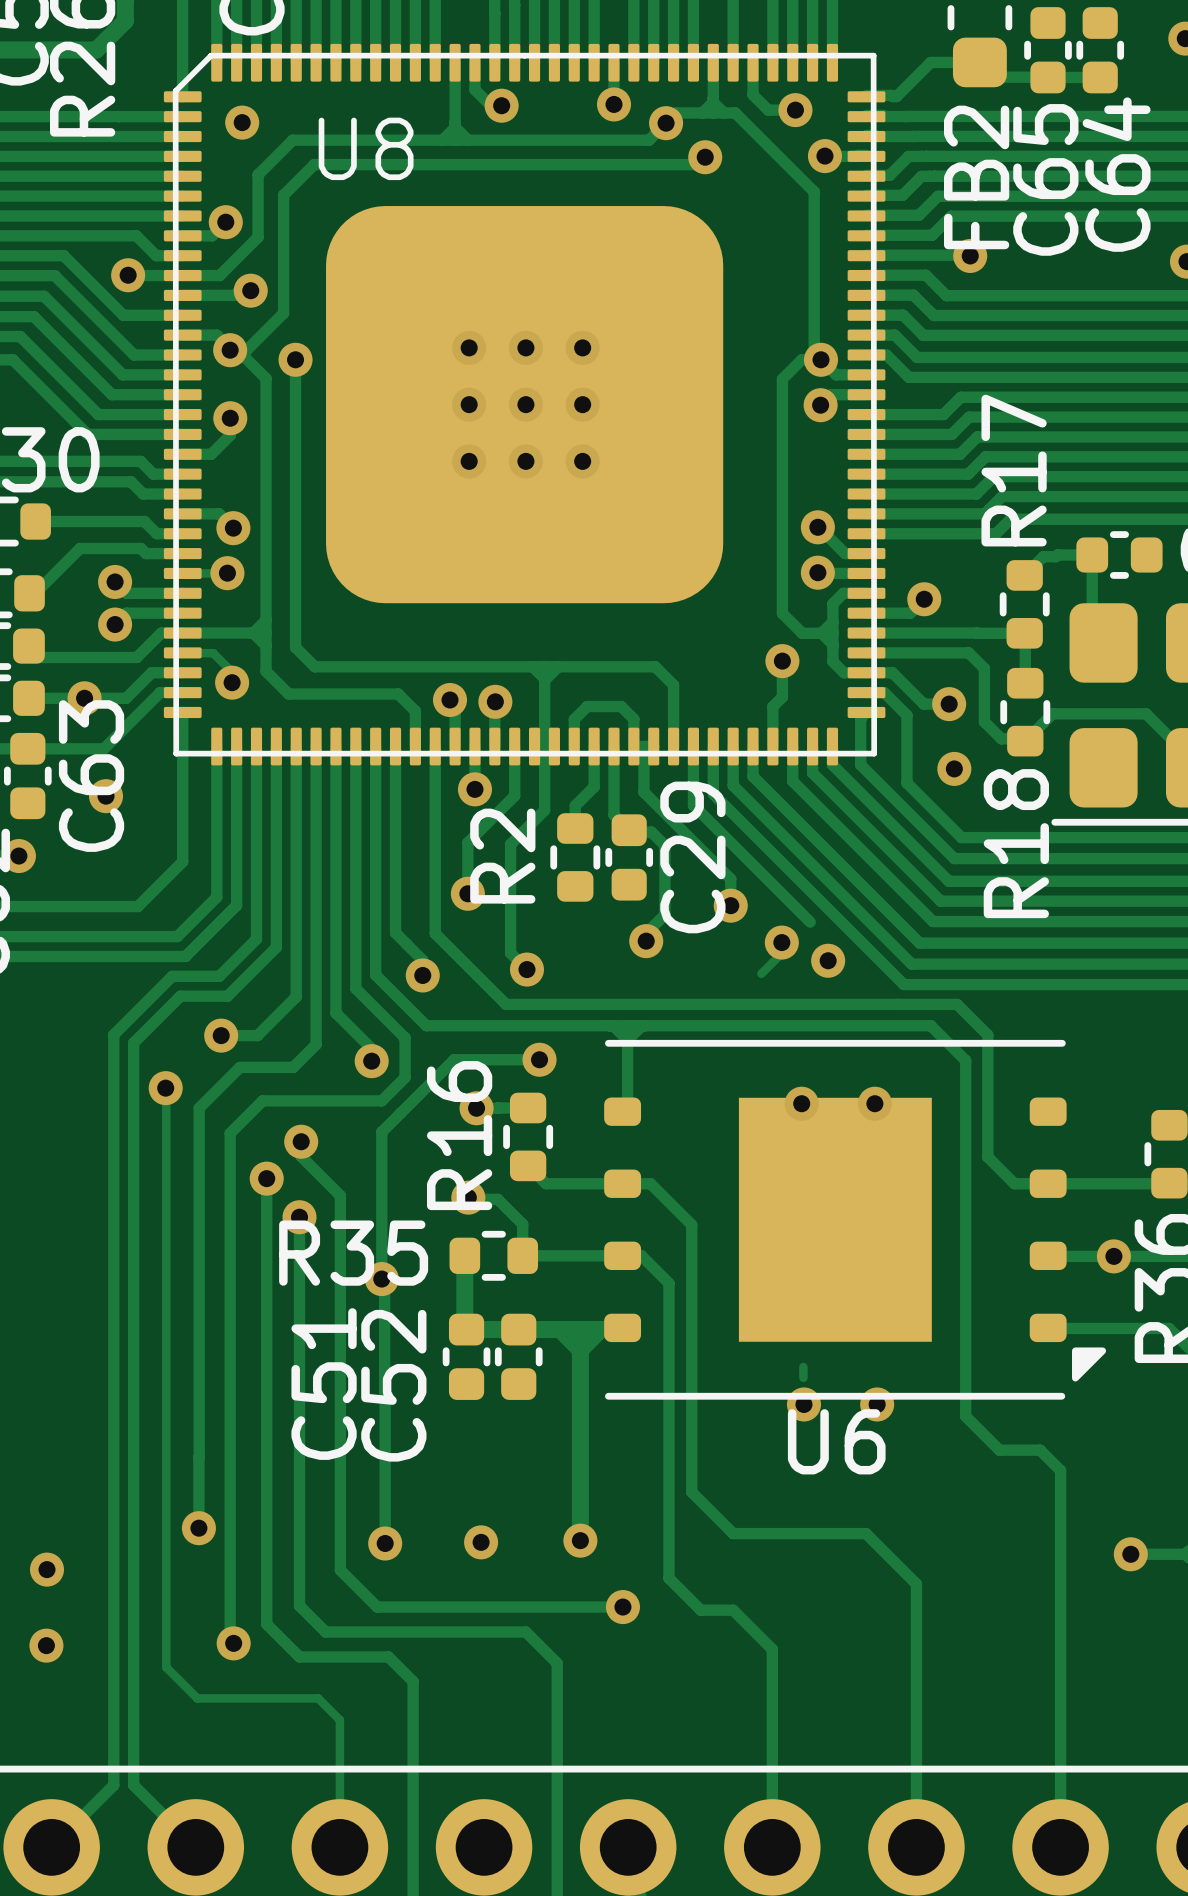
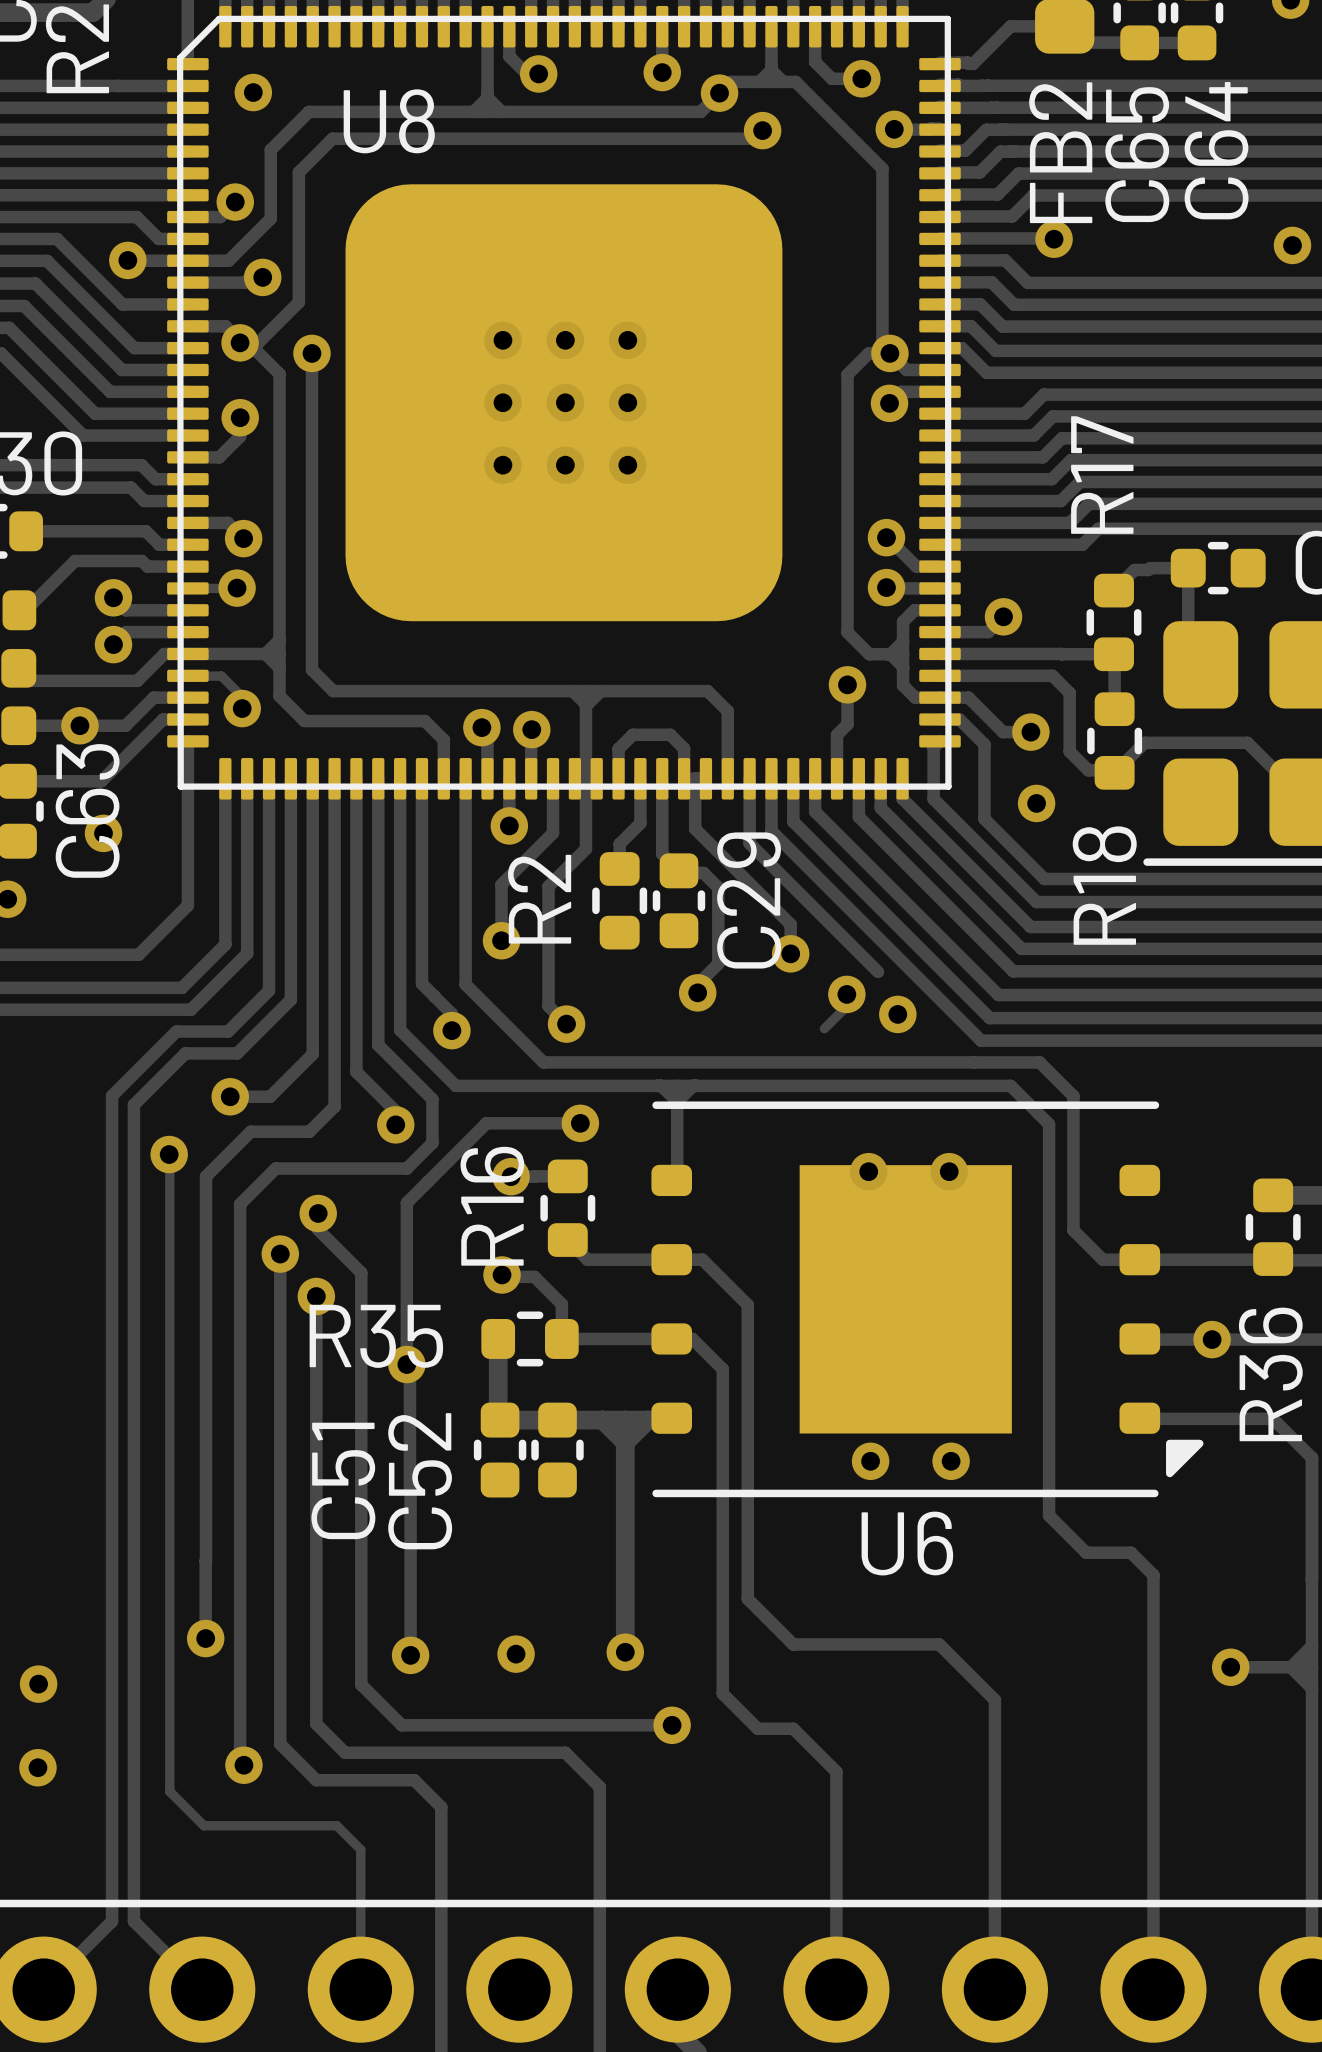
via position: (803, 1404) -> (870, 1461)
via position: (877, 1404) -> (951, 1461)

